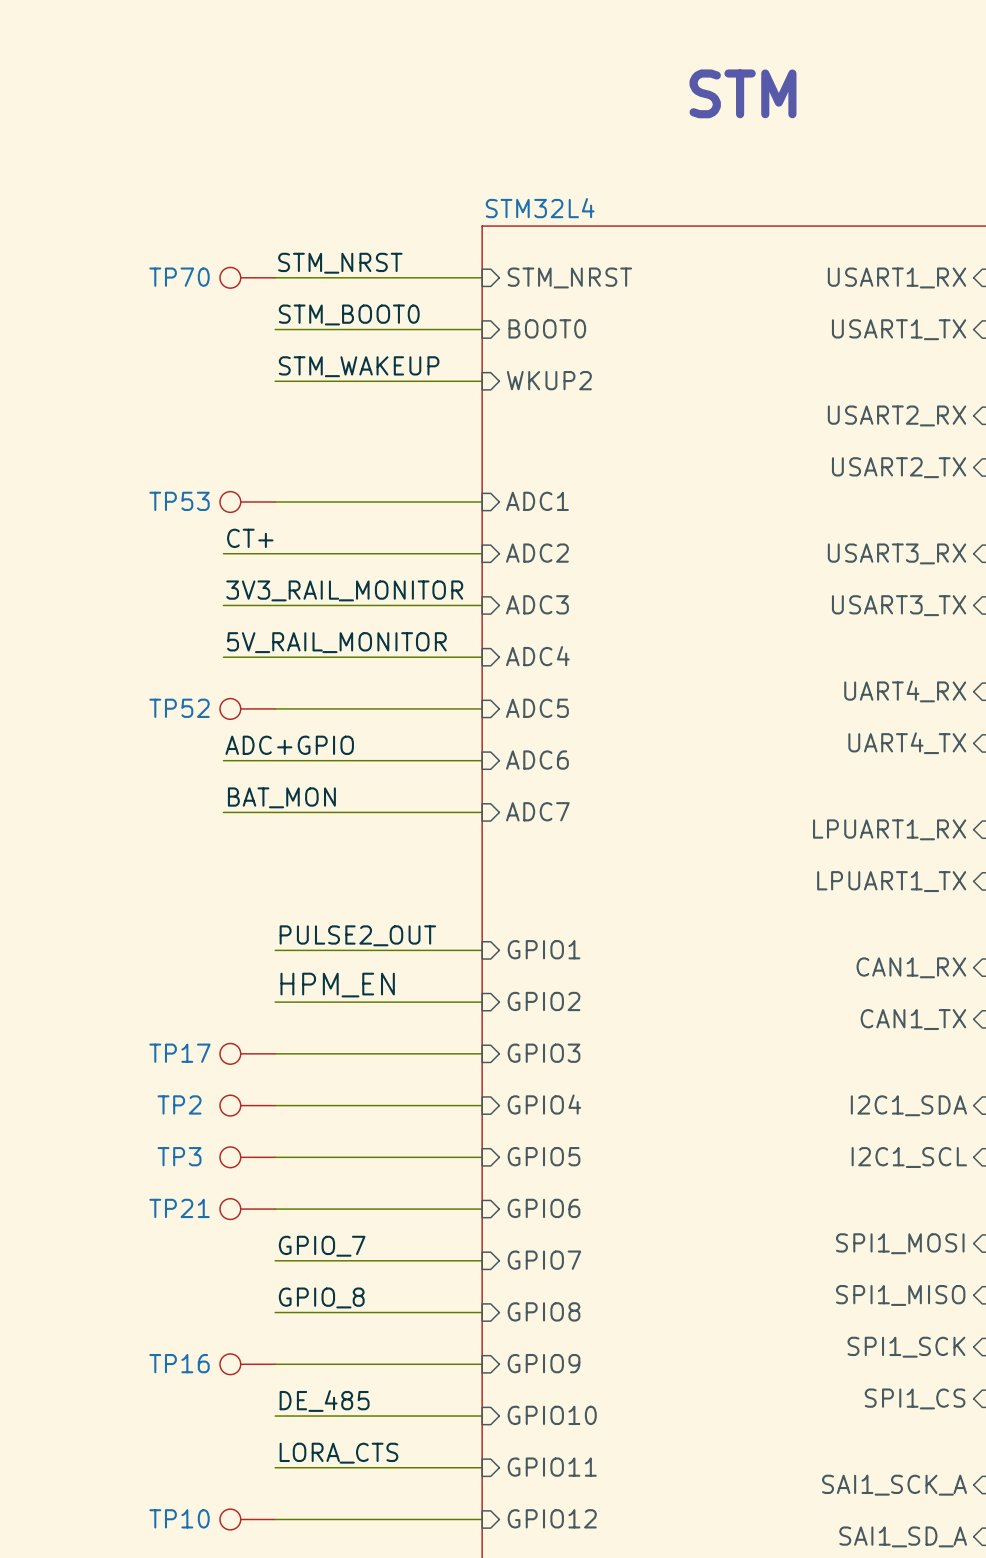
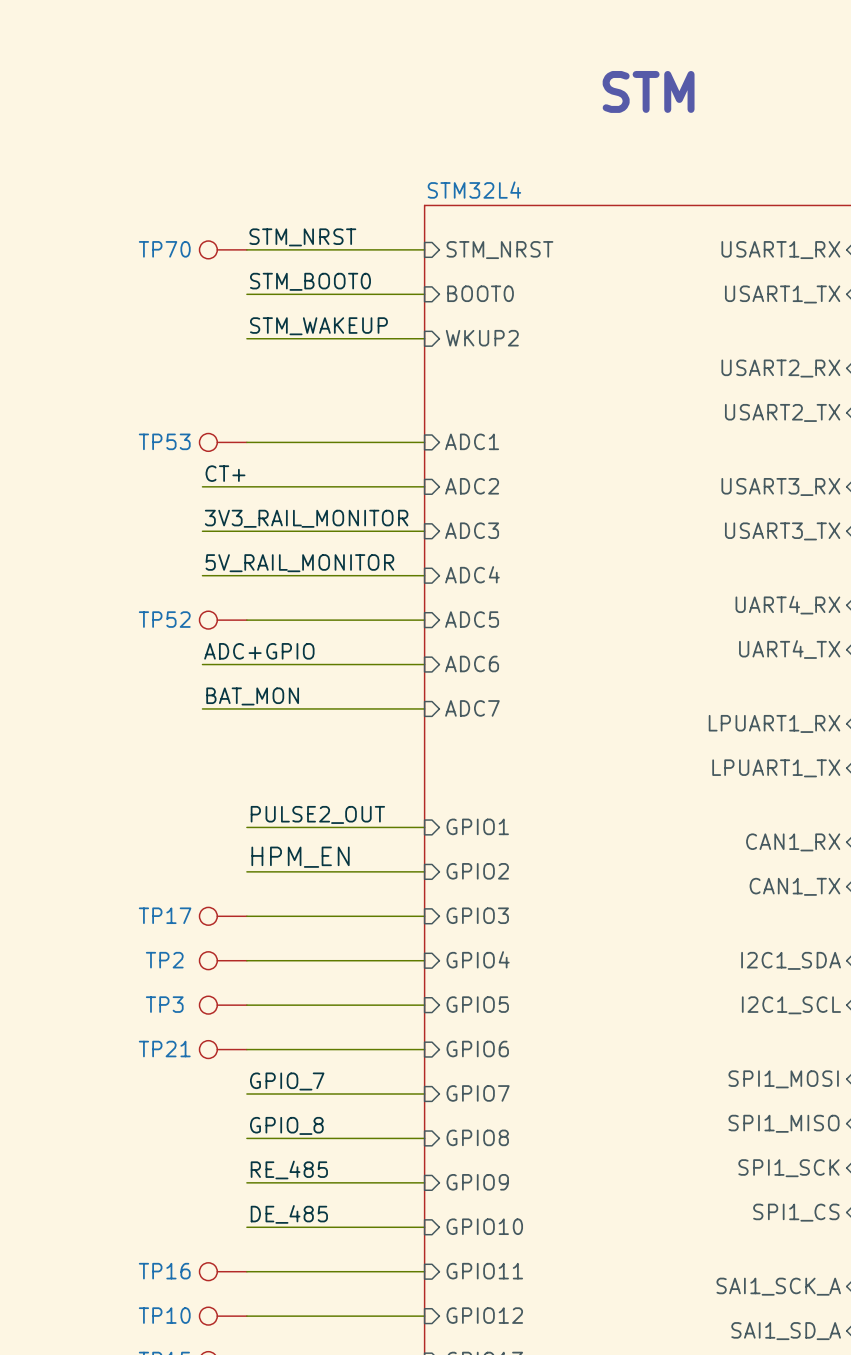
label: none -> RE_485 (289, 1169)
TP16 position: (247, 1364) -> (223, 1271)
label: LORA_CTS (338, 1453) -> none

